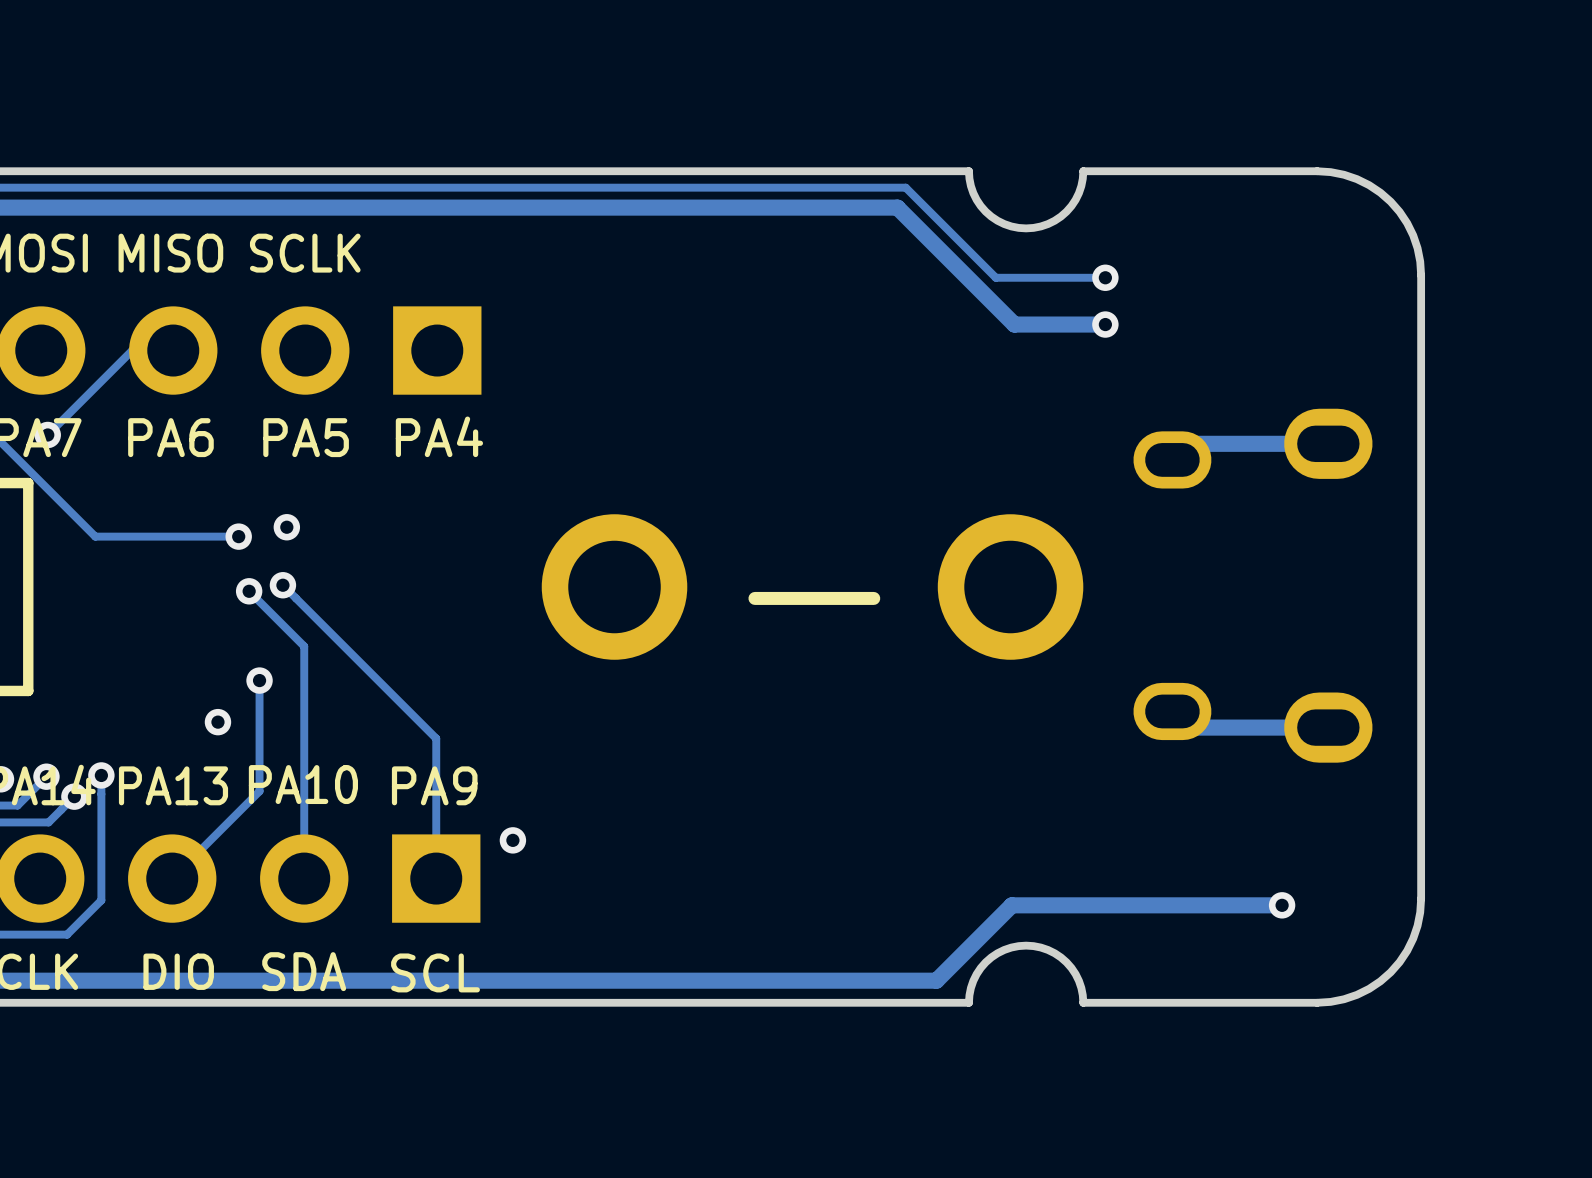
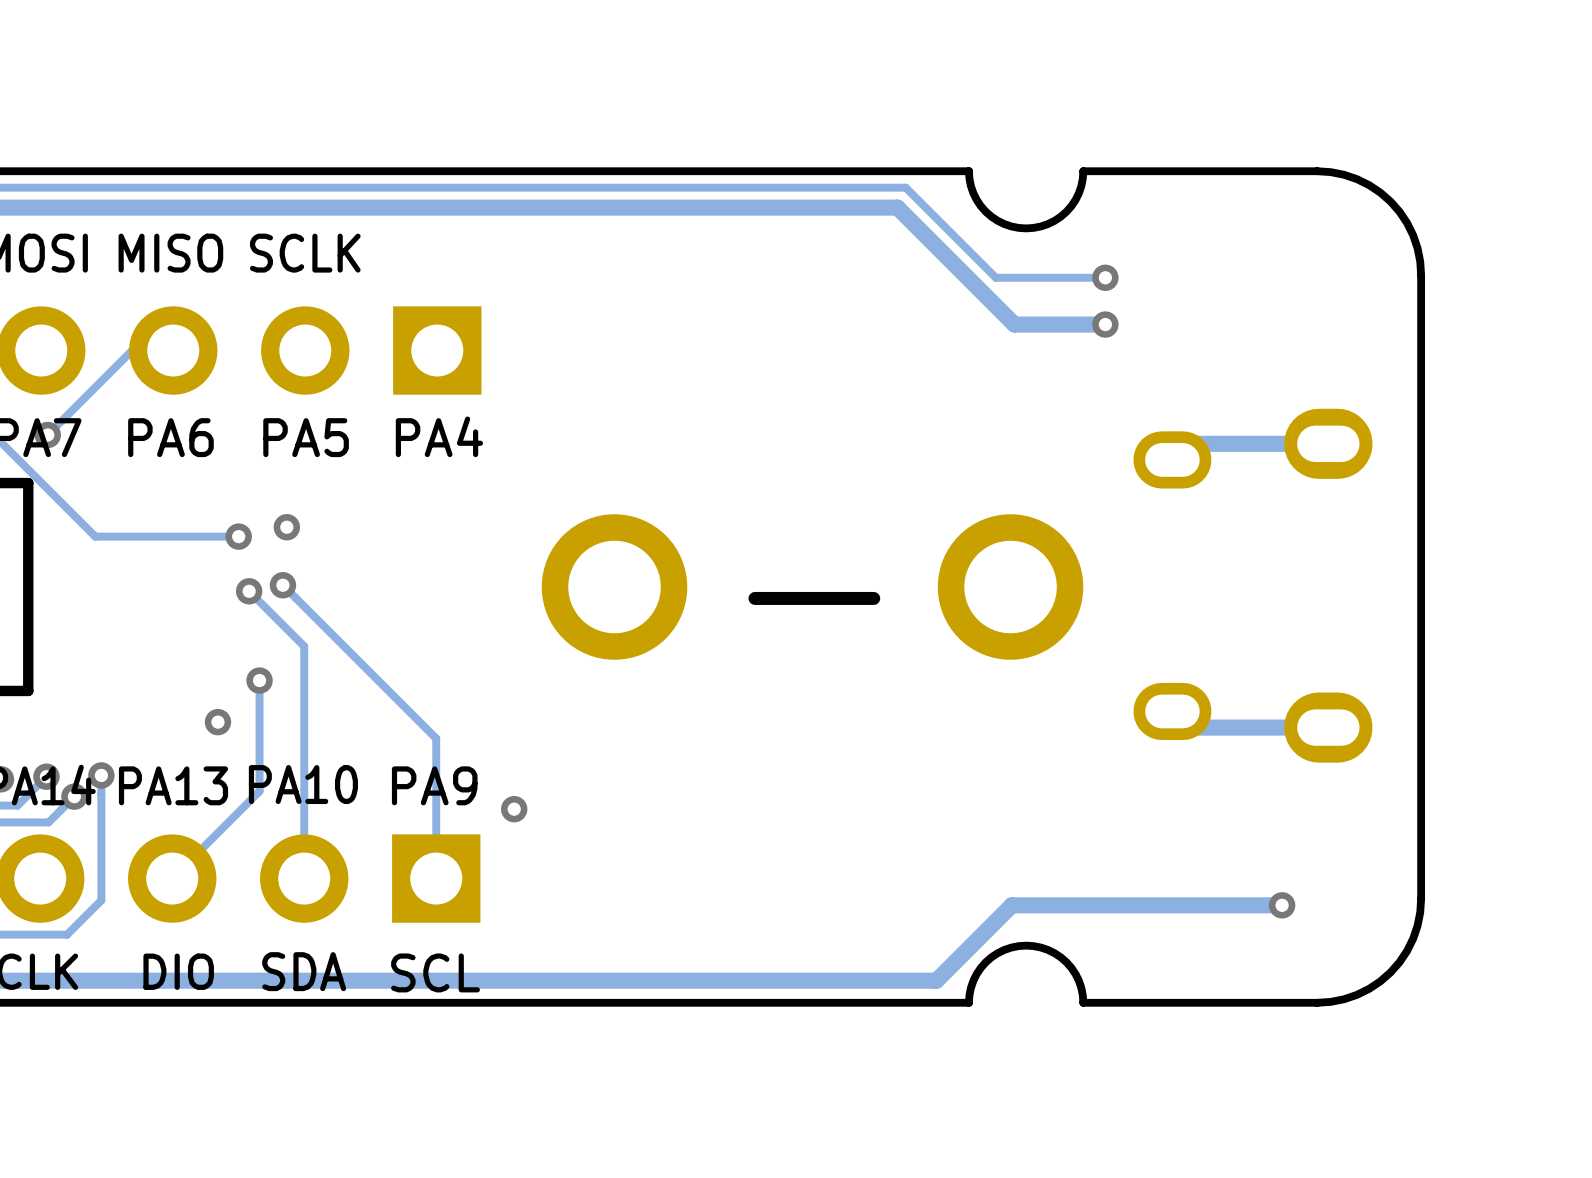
via position: (512, 840) -> (514, 809)

